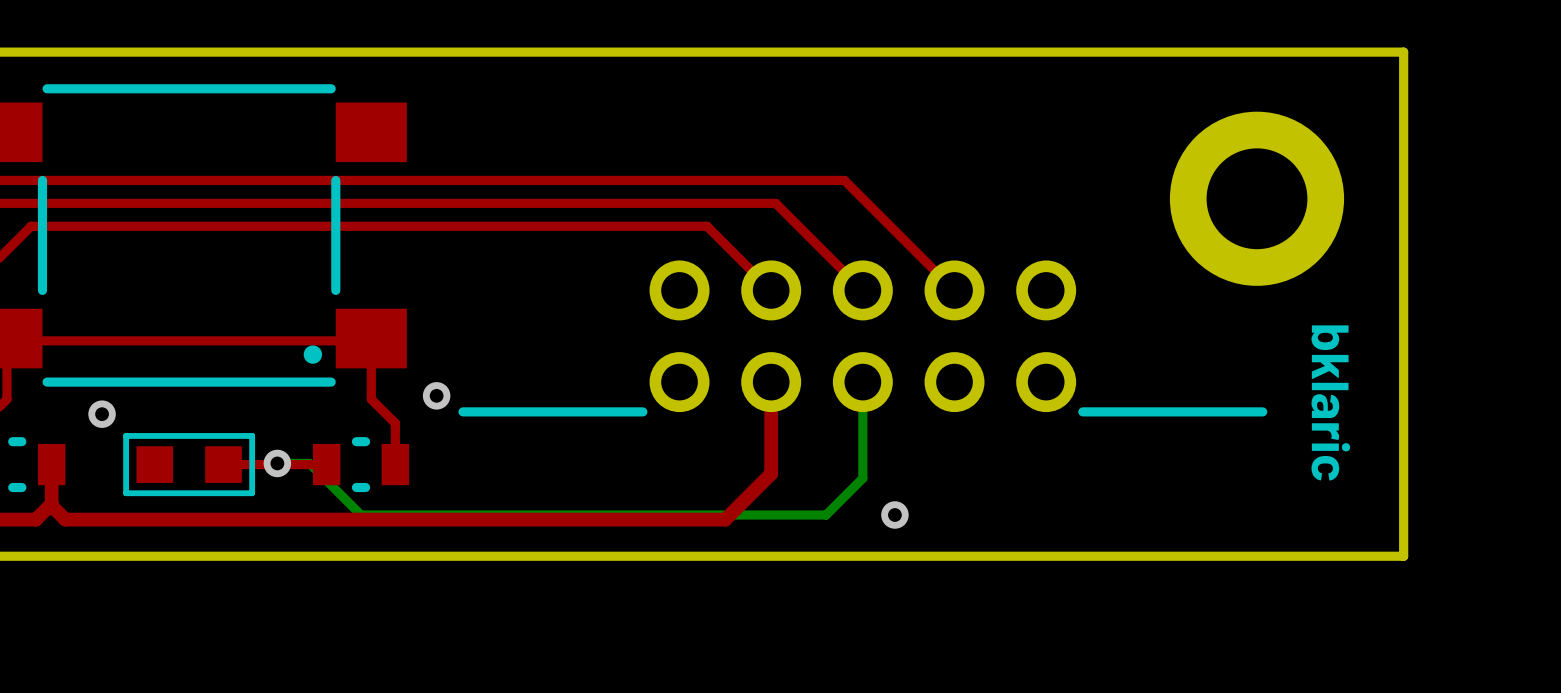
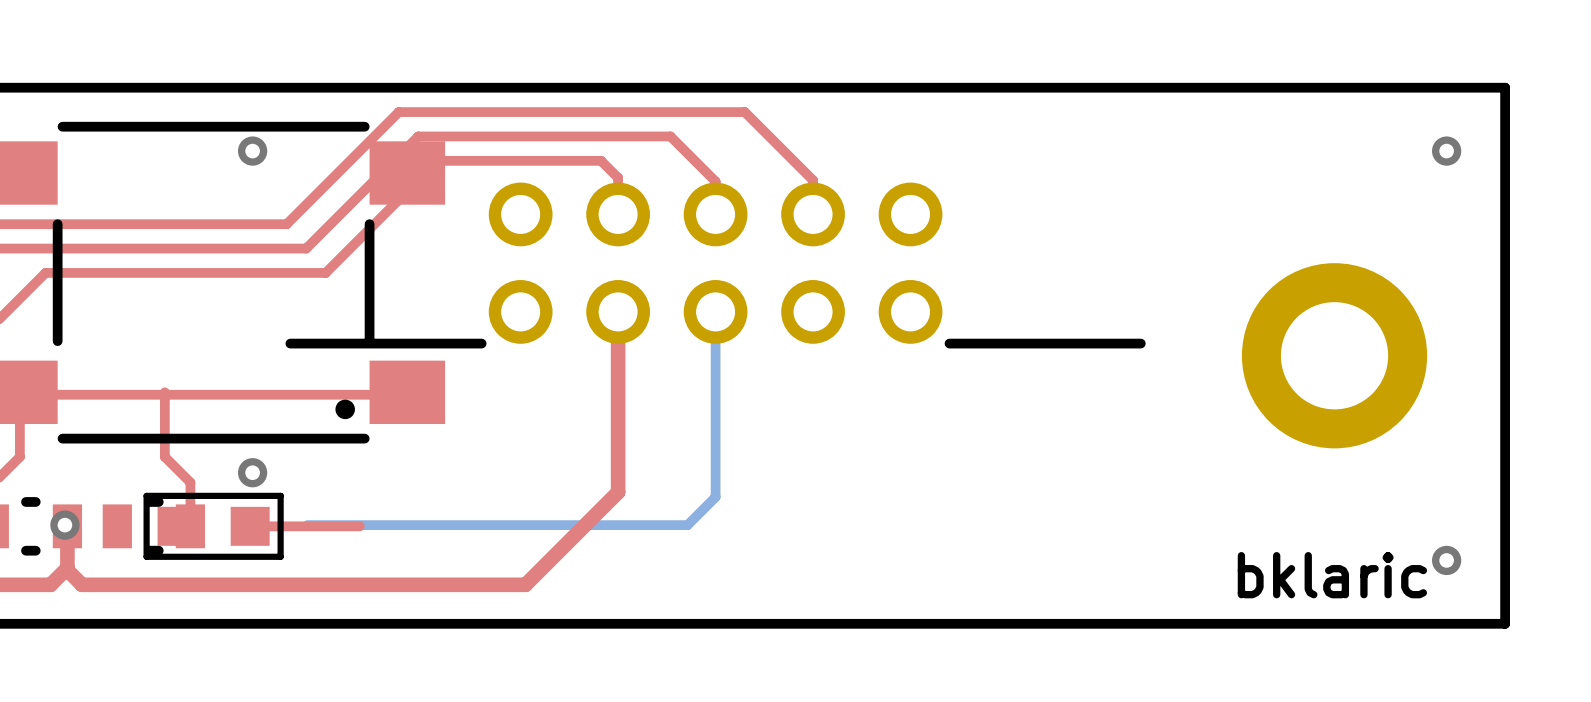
via: none -> (252, 151)
via: none -> (1446, 151)
top track: (257, 180) (844, 180) (954, 290) -> (286, 224) (398, 112) (744, 112) (813, 180) (813, 214)
part position: (1257, 198) -> (1334, 355)
top track: (276, 203) (775, 203) (862, 290) -> (306, 248) (418, 136) (670, 136) (715, 181) (715, 214)
top track: (294, 226) (707, 226) (771, 290) -> (325, 272) (437, 160) (601, 160) (618, 177) (618, 214)
top track: (371, 338) (371, 399) (395, 423) (395, 464) -> (164, 392) (164, 456) (190, 482) (190, 526)
part position: (862, 338) -> (715, 265)
top track: (771, 382) (771, 473) (725, 519) (482, 519) -> (618, 311) (618, 492) (525, 584)
bottom track: (862, 382) (862, 478) (826, 515) (361, 515) (309, 463) -> (715, 311) (715, 497) (687, 525) (341, 525)
via: (436, 395) -> none
text rotation: 0° (1330, 402) -> 90° counterclockwise (1332, 575)
via: (102, 414) -> none
via: none -> (252, 472)
via: none -> (64, 525)
via: (277, 463) -> none
part: none -> (153, 526)
part: (361, 464) -> none
via: none -> (1446, 560)
via: (894, 515) -> none

